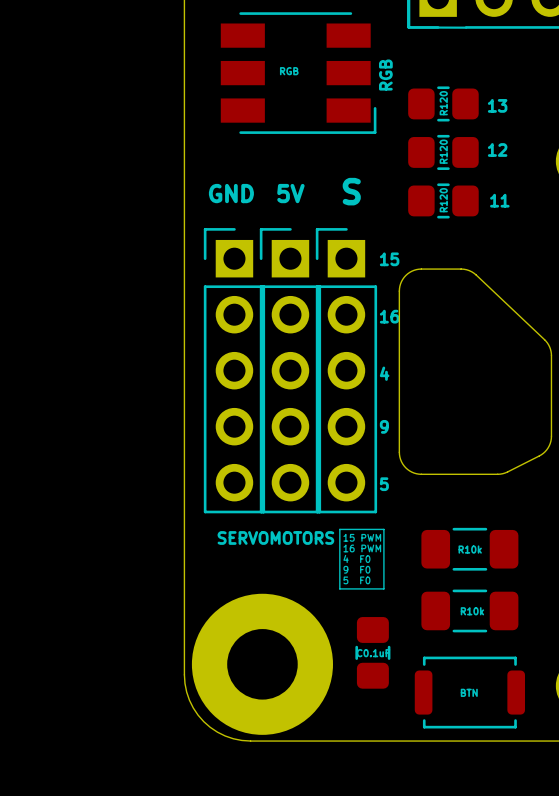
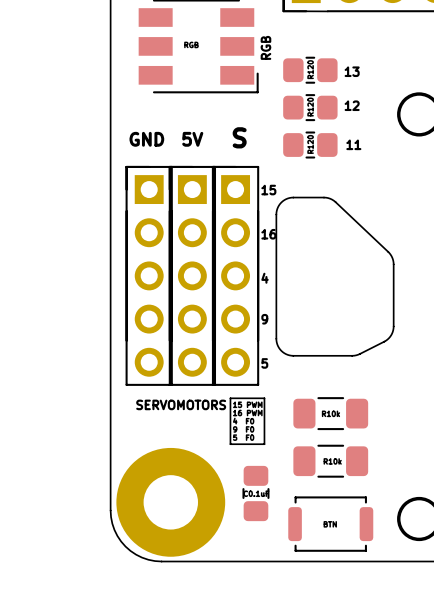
part footprint: [203, 228, 266, 514] -> [125, 165, 173, 386]
part footprint: [259, 228, 322, 514] -> [168, 165, 217, 386]
part footprint: [315, 228, 378, 514] -> [211, 165, 260, 386]

